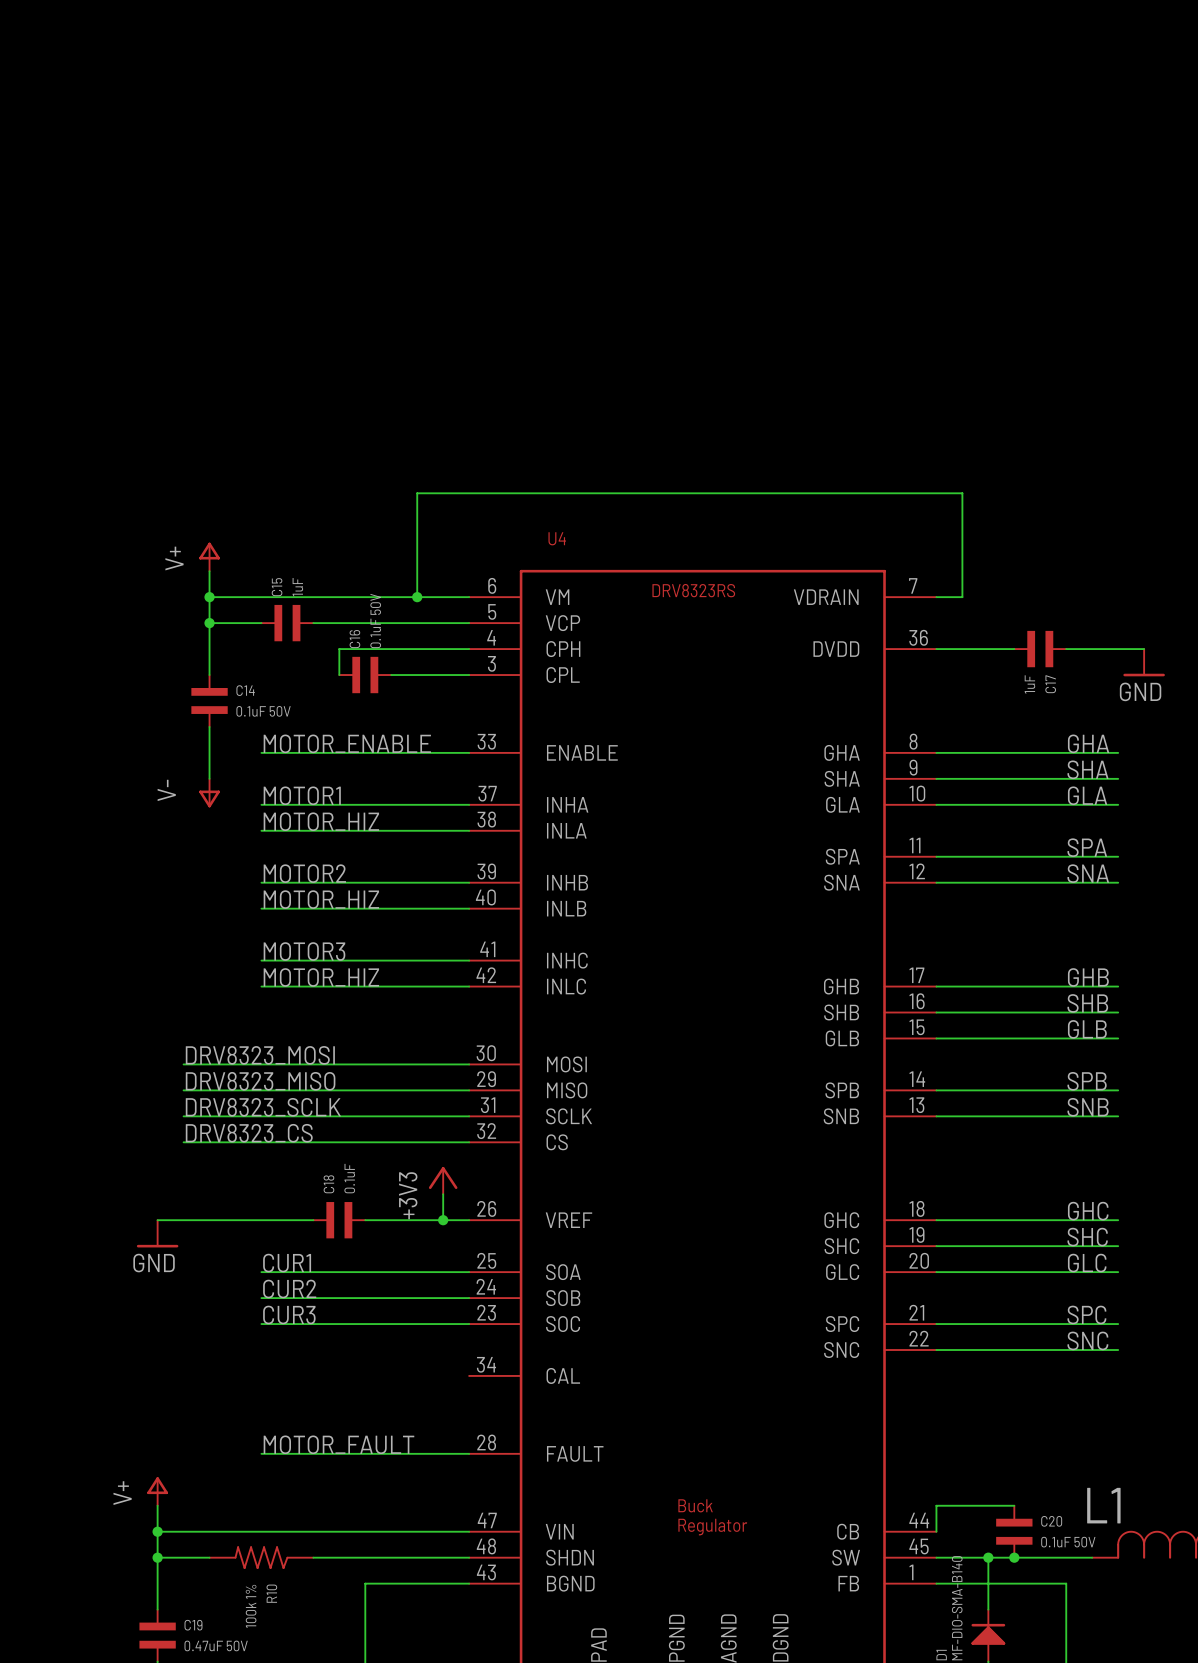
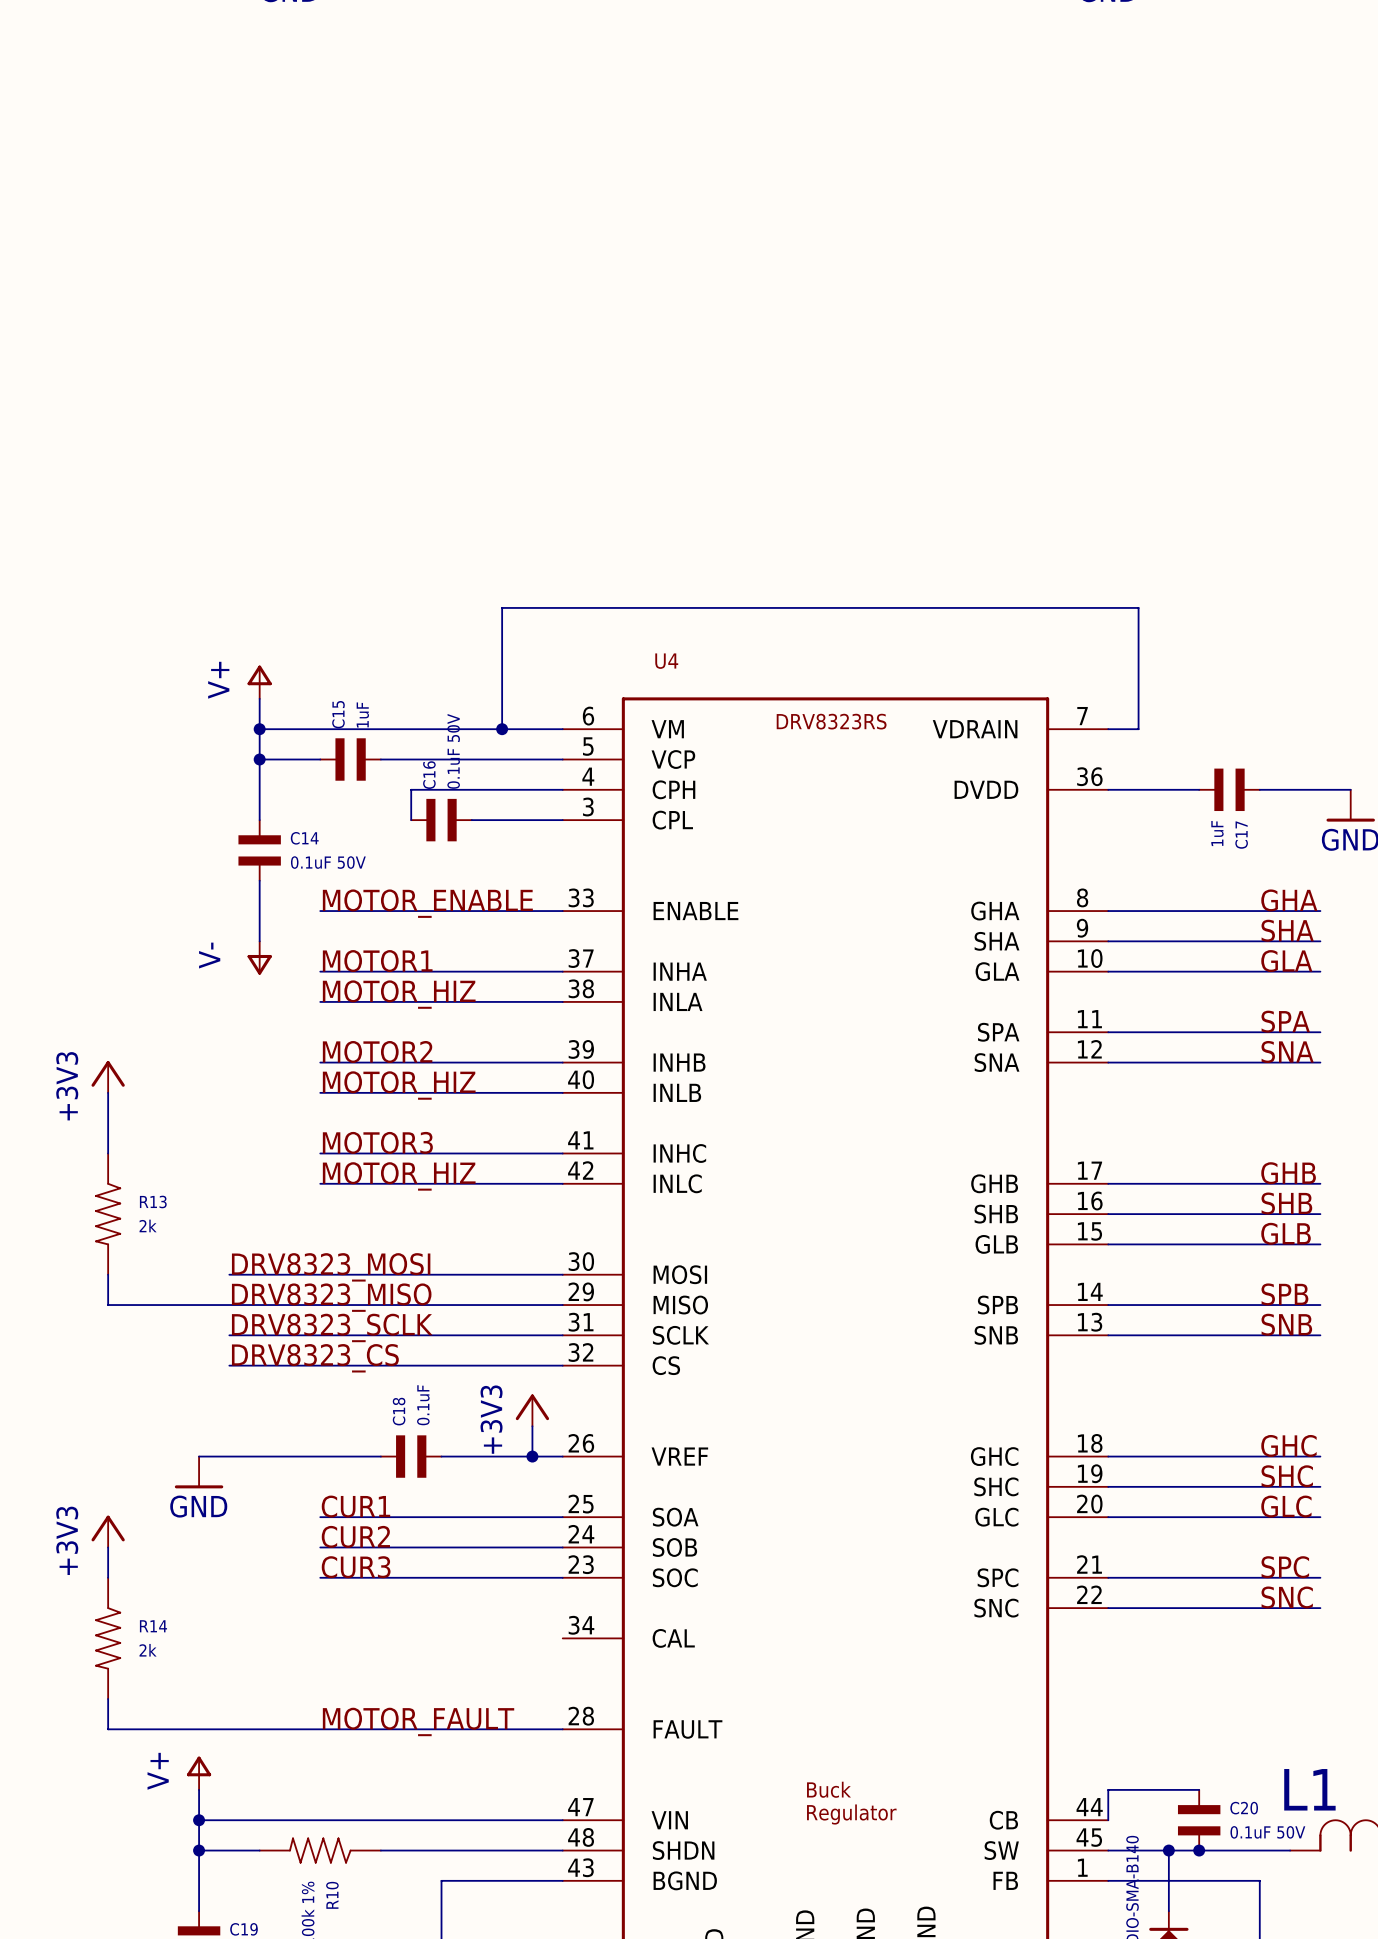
power symbol: none -> +3V3 (108, 1076)
wire: none -> (108, 1092) (108, 1153)
R13: none -> 2k (108, 1214)
wire: none -> (108, 1274) (108, 1305) (229, 1305)
power symbol: none -> +3V3 (108, 1531)
wire: none -> (108, 1547) (108, 1577)
R14: none -> 2k (108, 1638)
wire: none -> (108, 1699) (108, 1729) (320, 1729)

